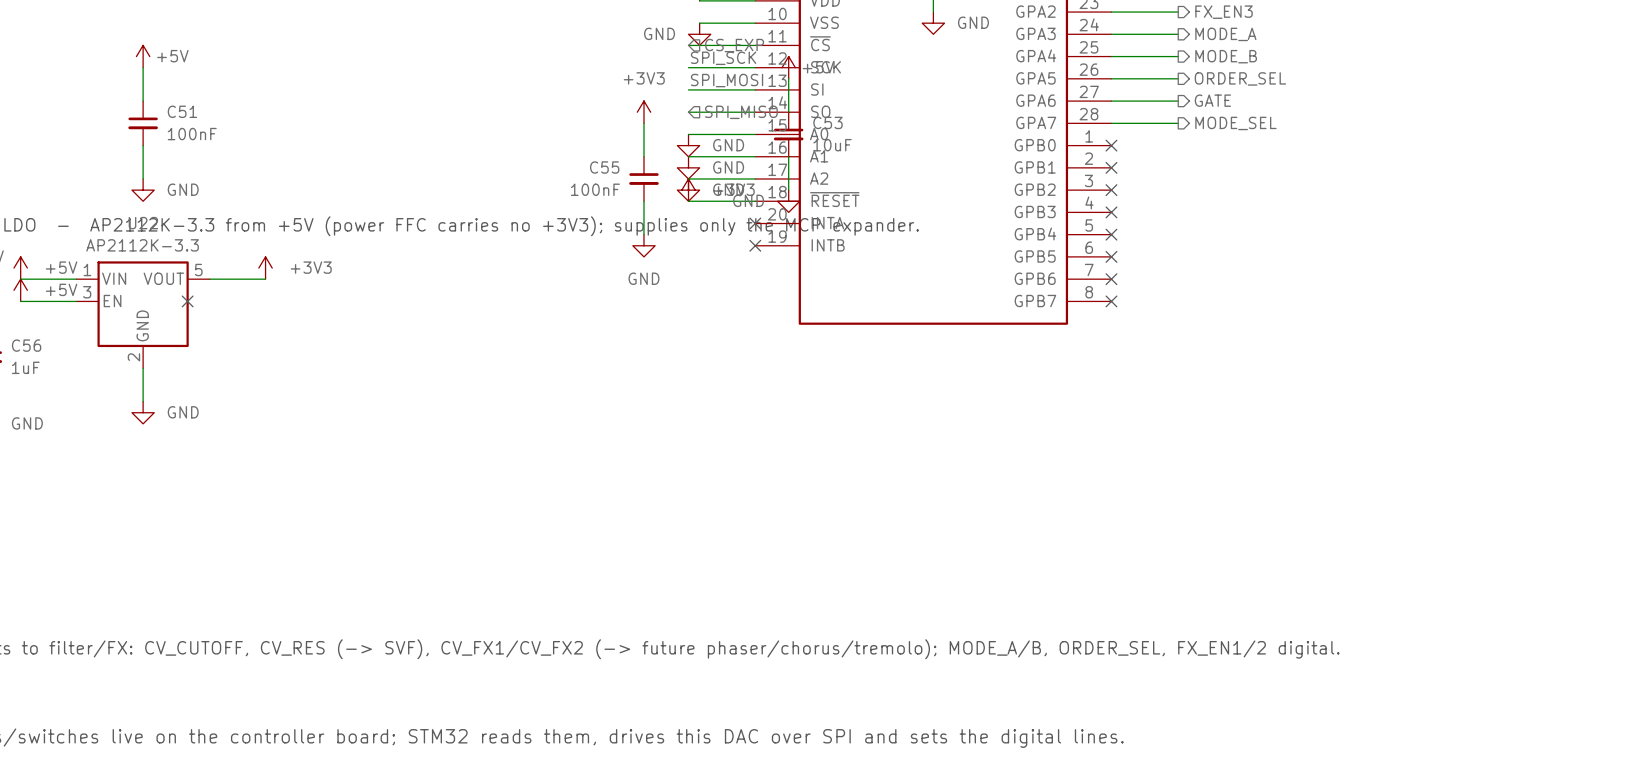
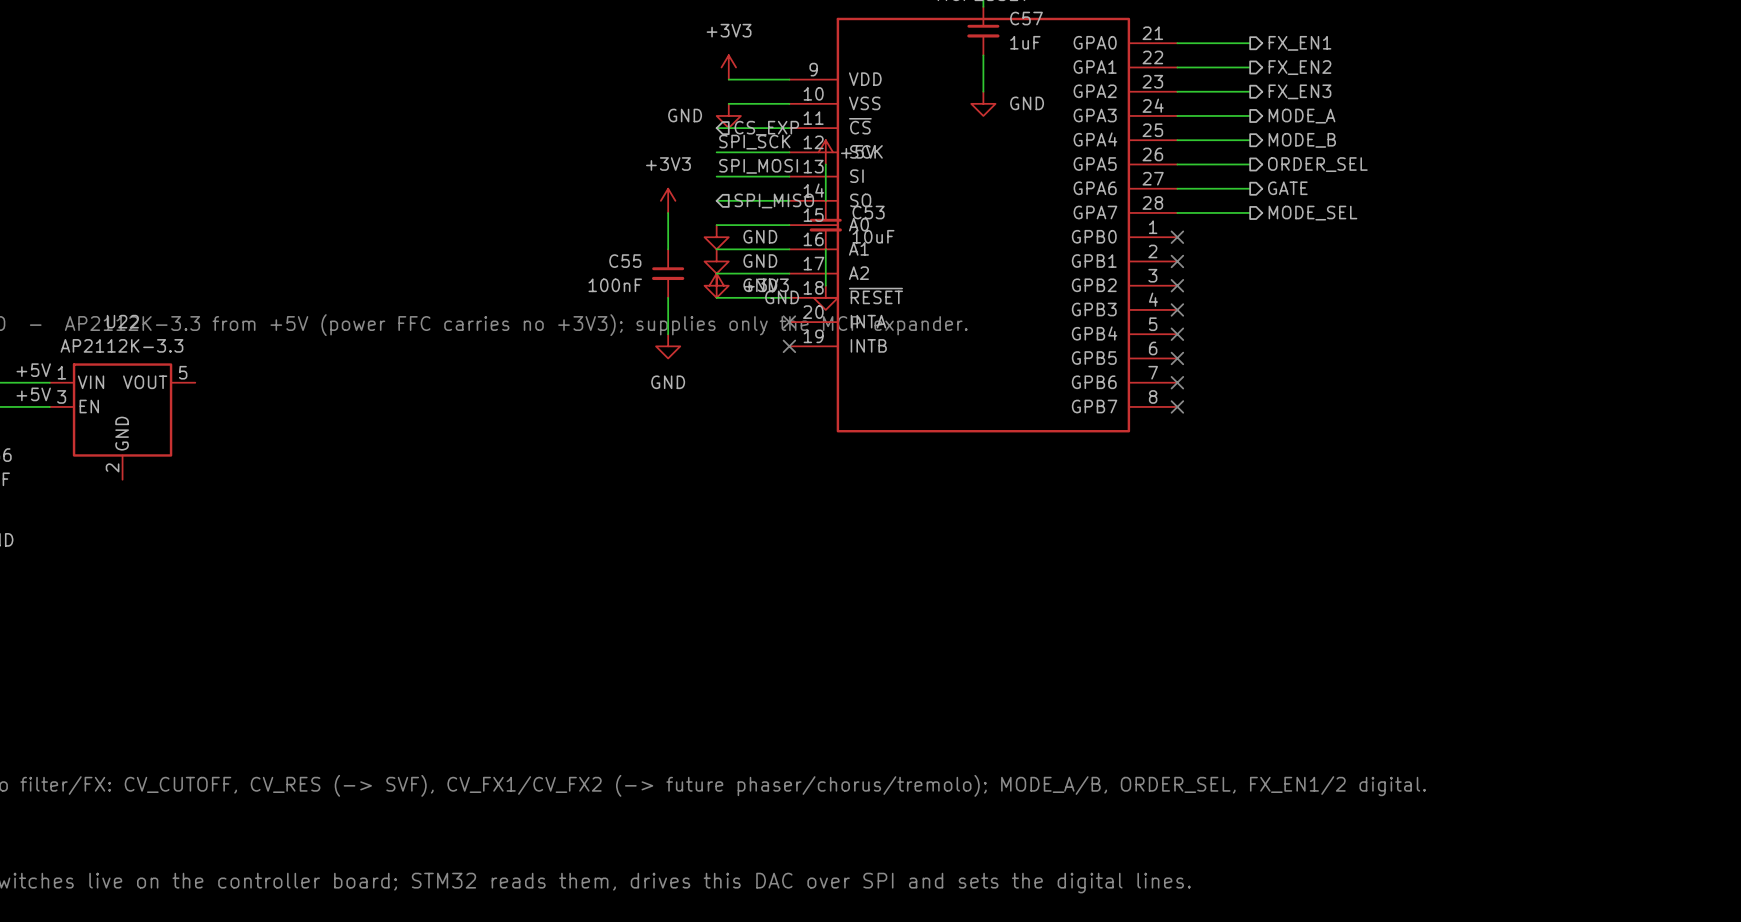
power symbol: +5V (143, 56) -> none
wire: (143, 67) (143, 101) -> none
C51: 100nF (143, 123) -> none
wire: (143, 145) (143, 178) -> none
power symbol: GND (143, 190) -> none
power symbol: +3V3 (265, 268) -> none
wire: (209, 279) (265, 279) -> none
no-connect mark: (187, 301) -> none
wire: (143, 368) (143, 401) -> none
power symbol: GND (143, 412) -> none

